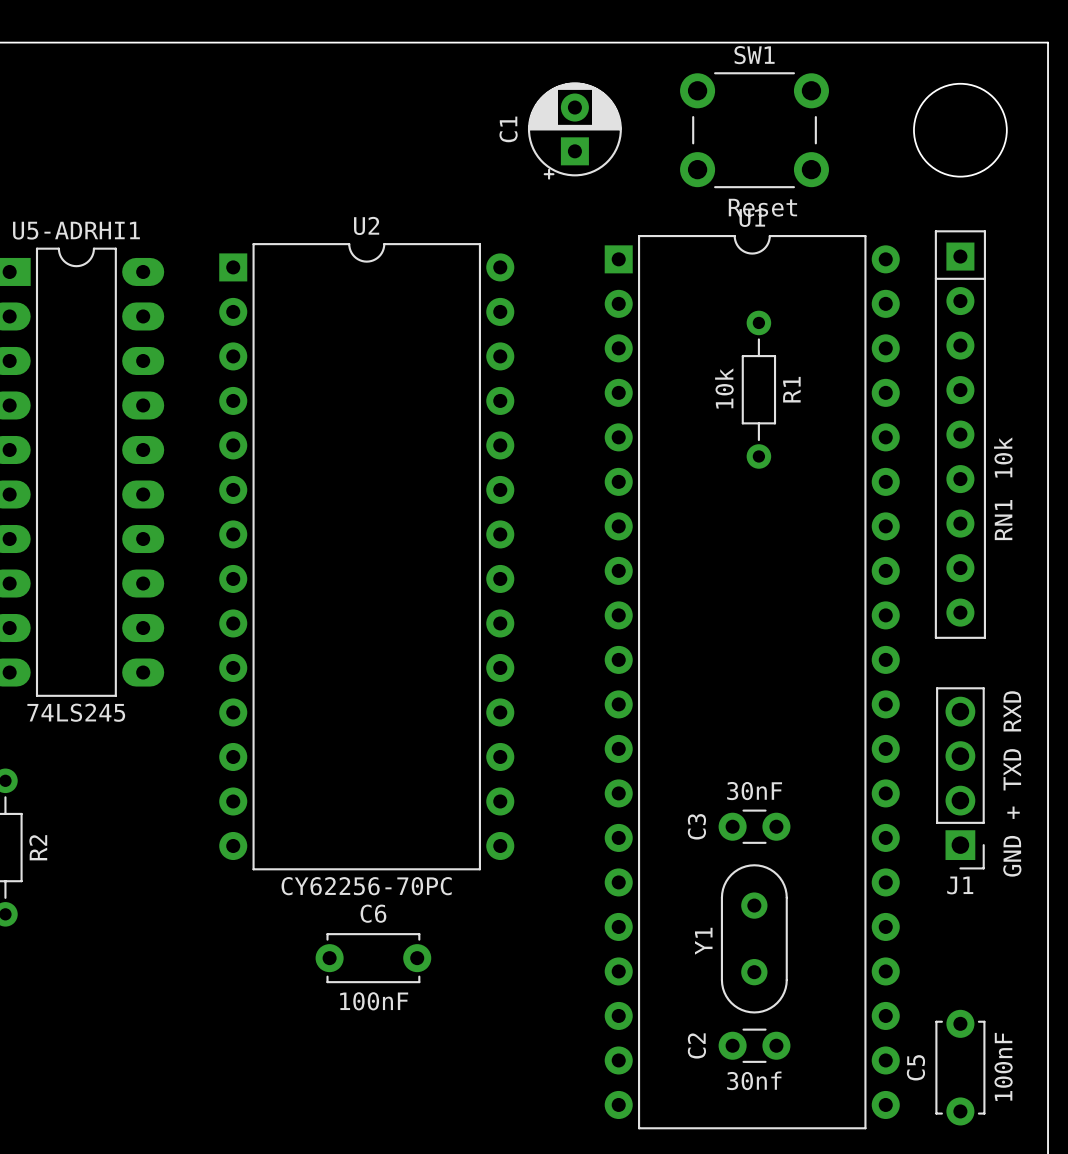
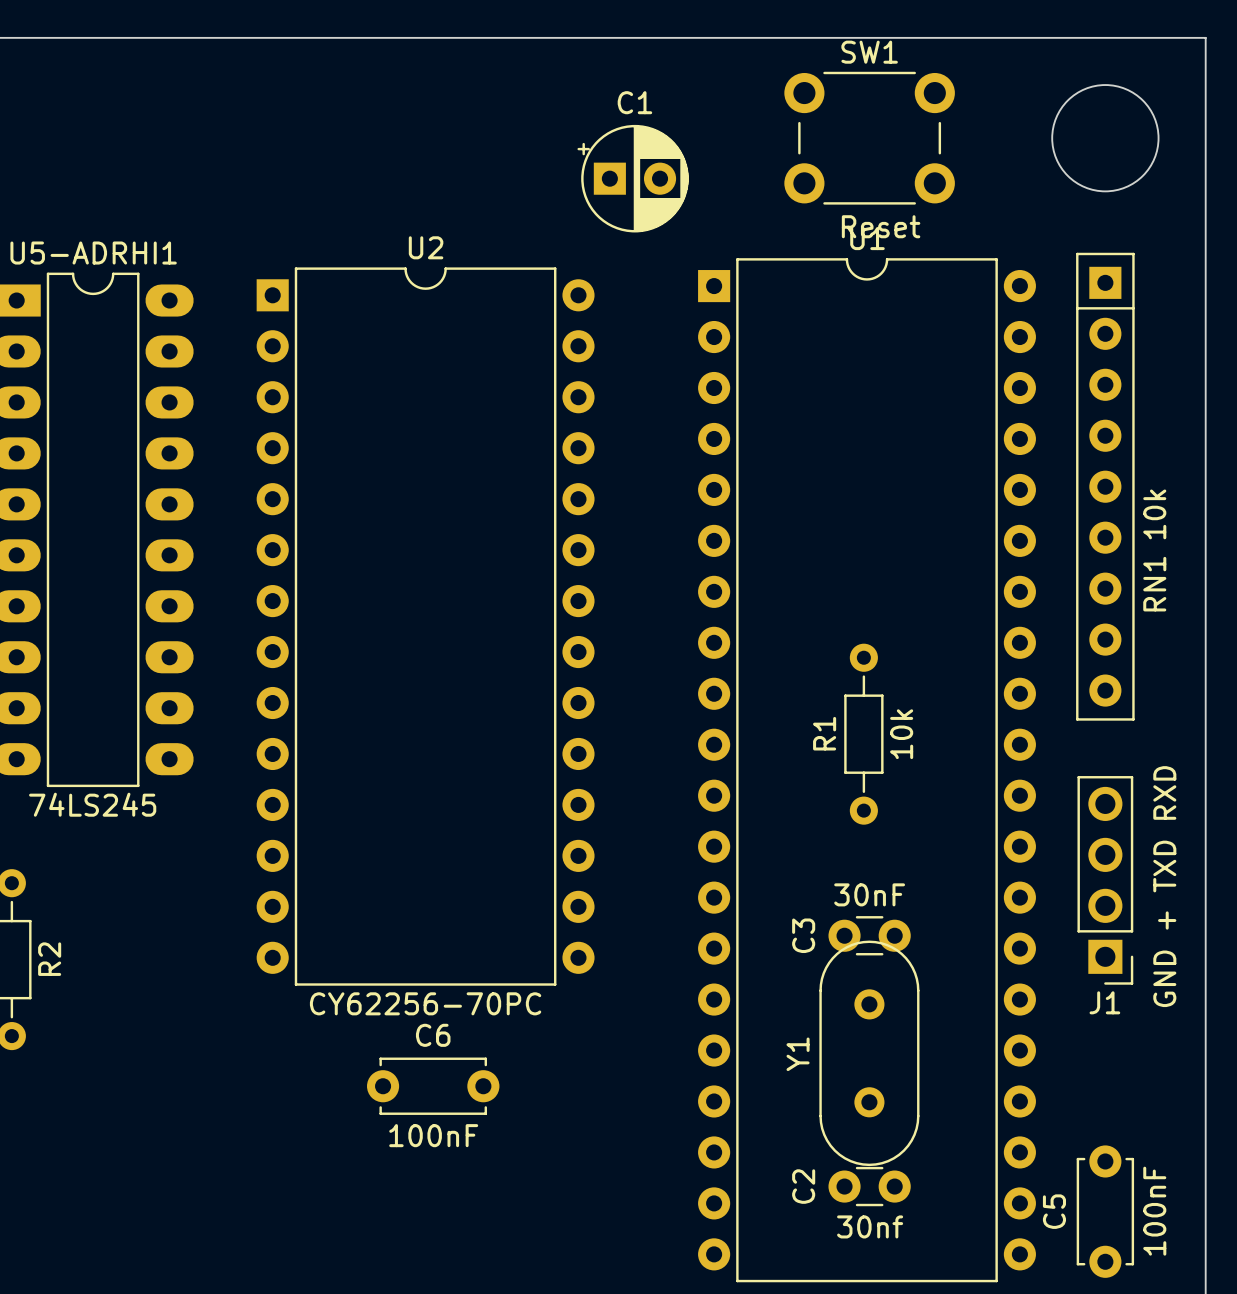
C1 rotation: 0° (574, 131) -> 90° clockwise (633, 178)
R1 value position: 10k (724, 388) -> 10k (901, 734)
R1 position: (758, 389) -> (863, 734)
R1 name position: R1 (791, 389) -> R1 (824, 733)
Y1 footprint: [720, 864, 788, 1014] -> [819, 940, 920, 1167]

